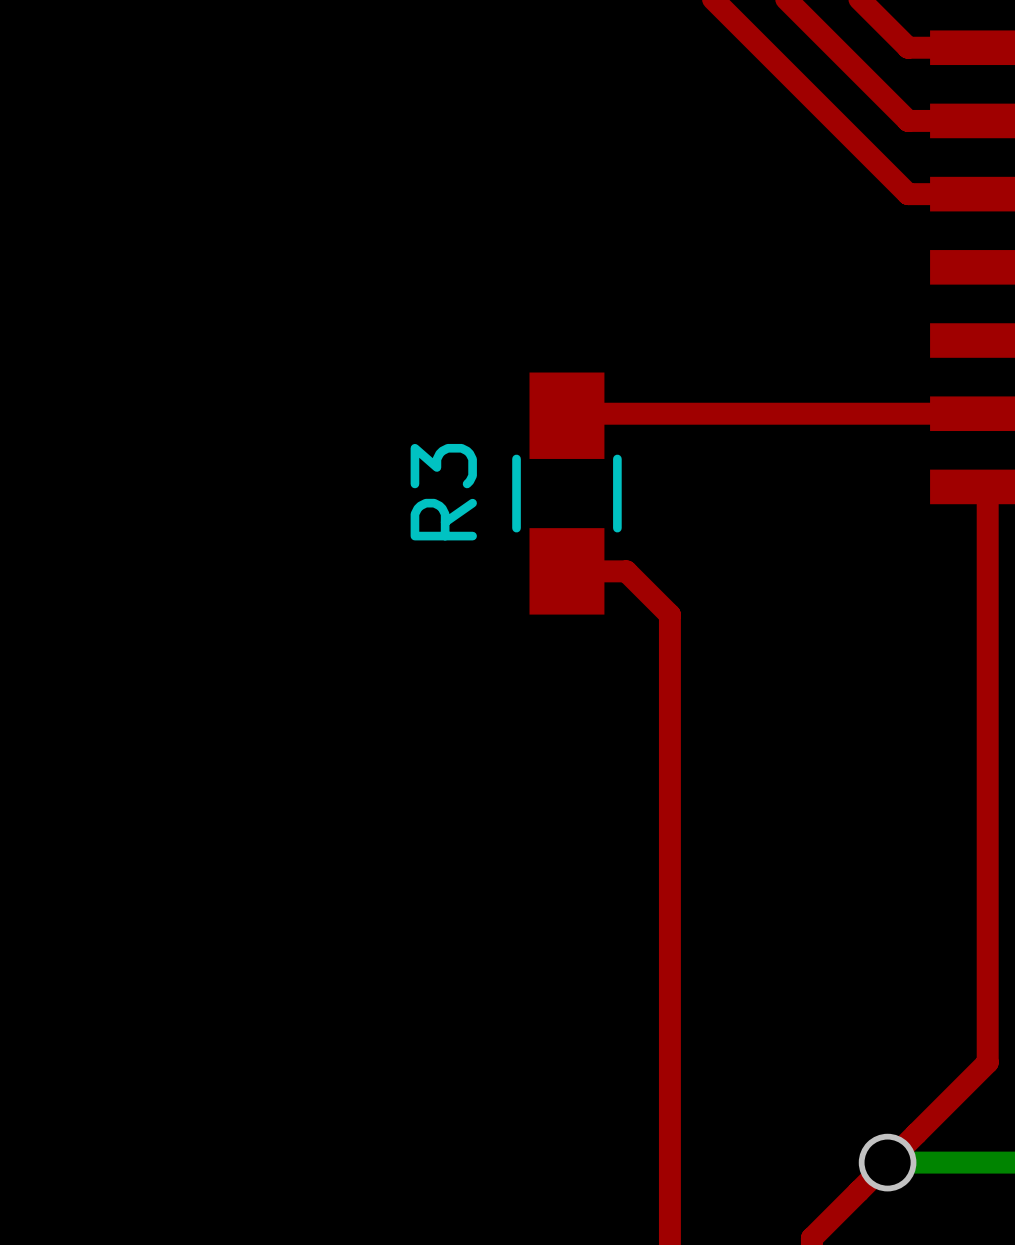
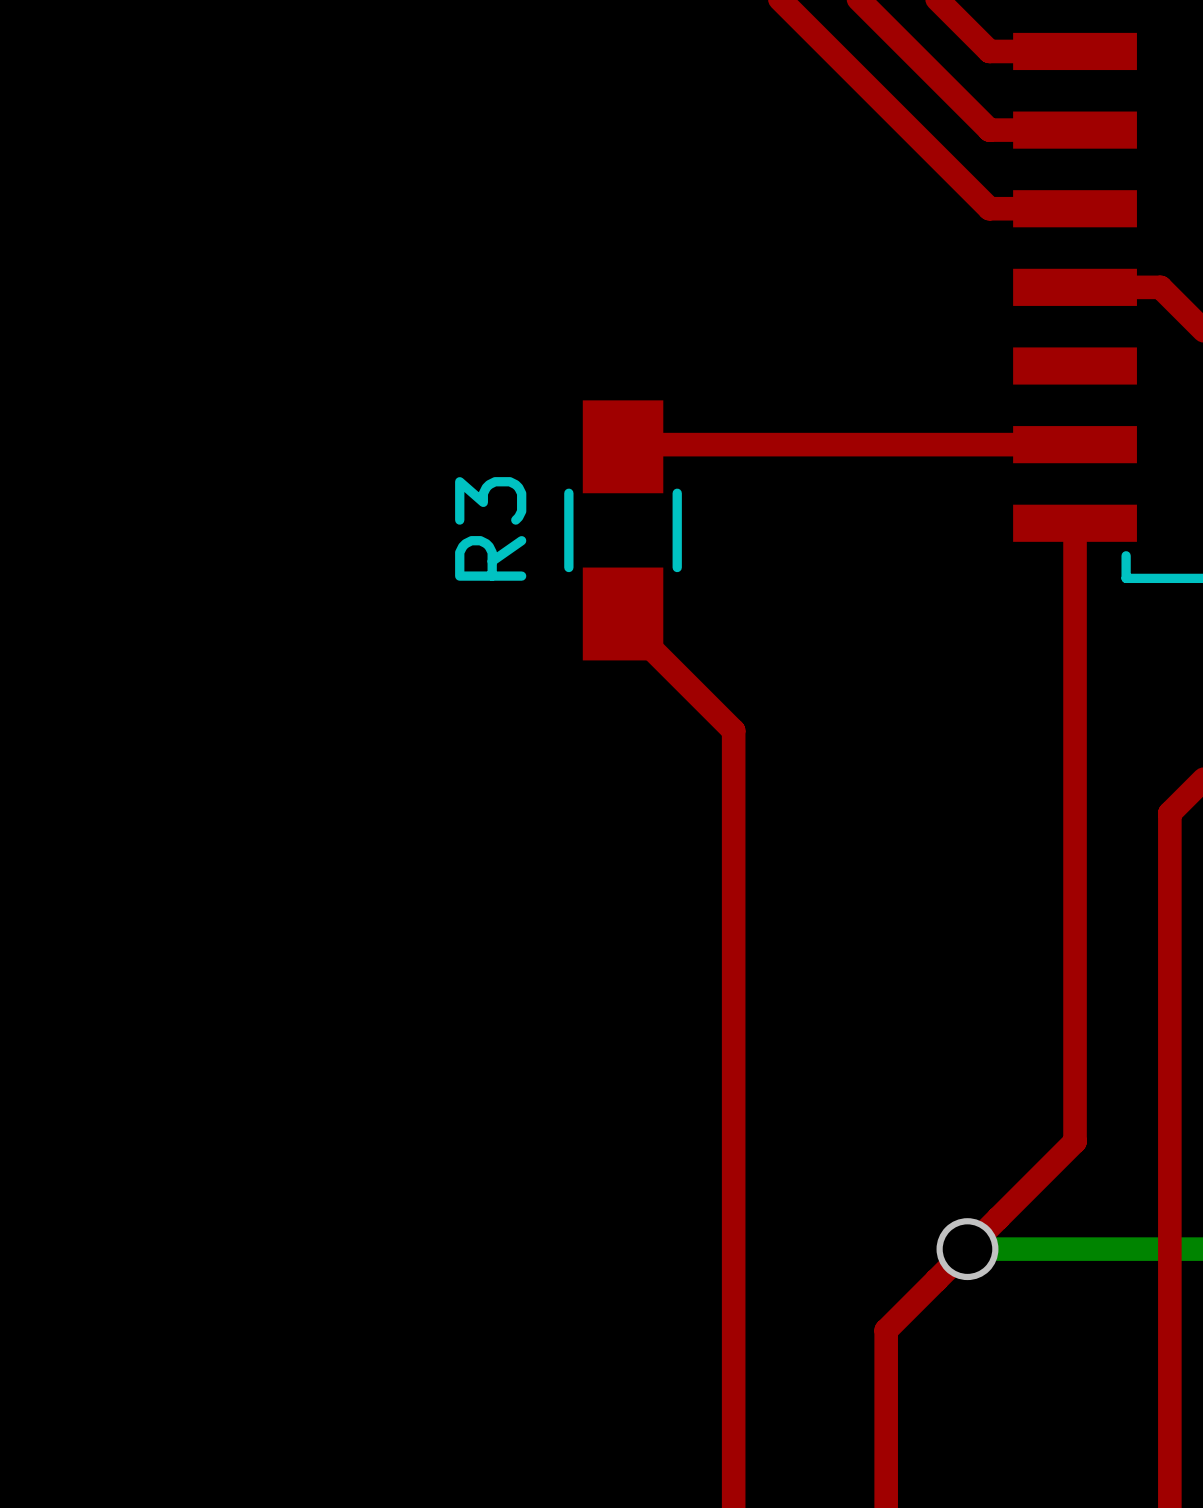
top track: (566, 571) (626, 571) (669, 614) (669, 680) -> (623, 613) (623, 620) (733, 730)

